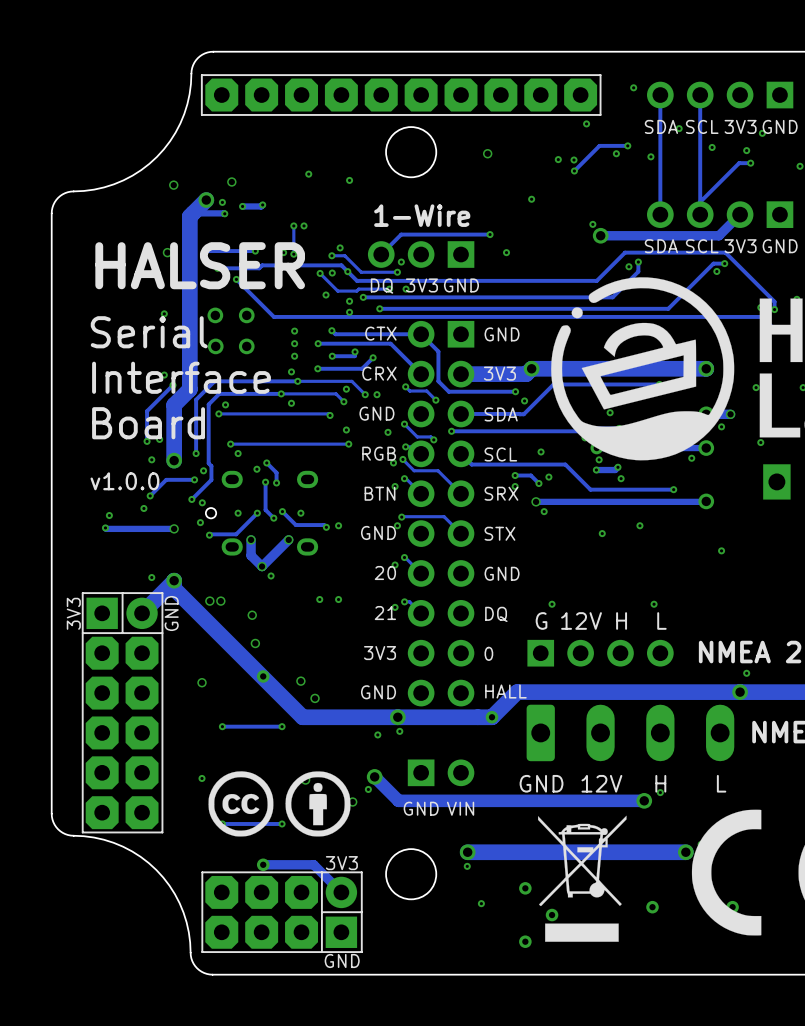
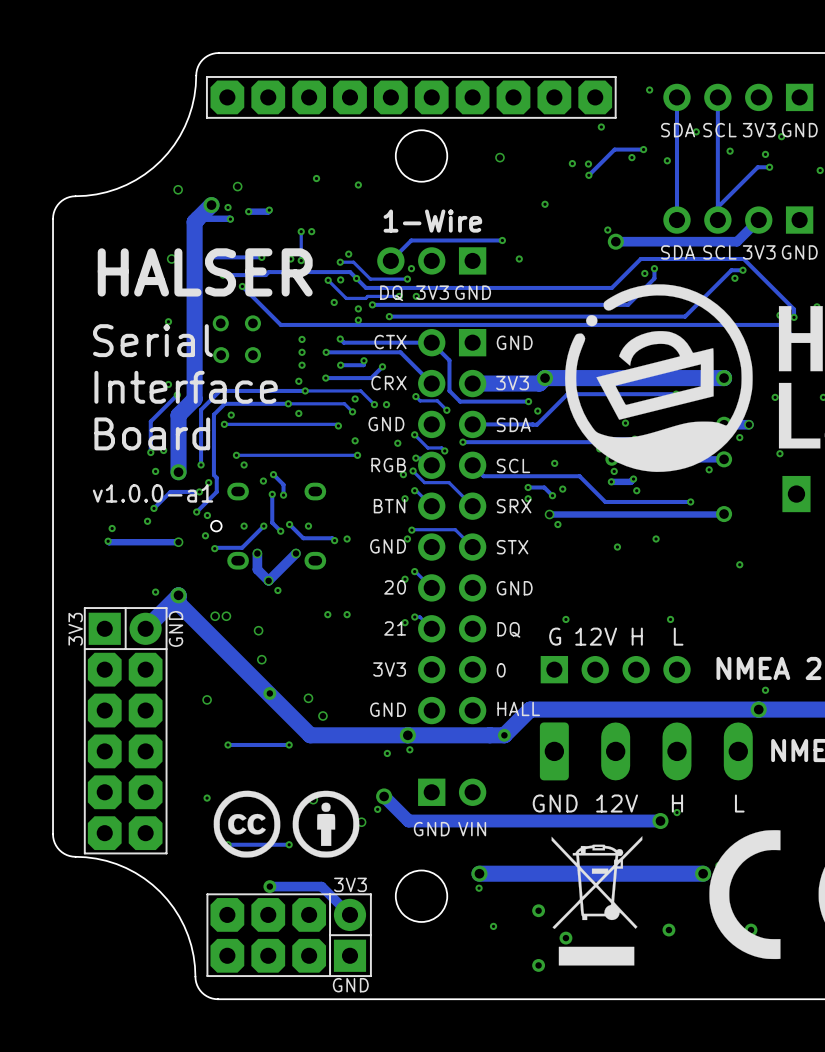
text: v1.0.0 (124, 481) -> v1.0.0-a1 (153, 493)

